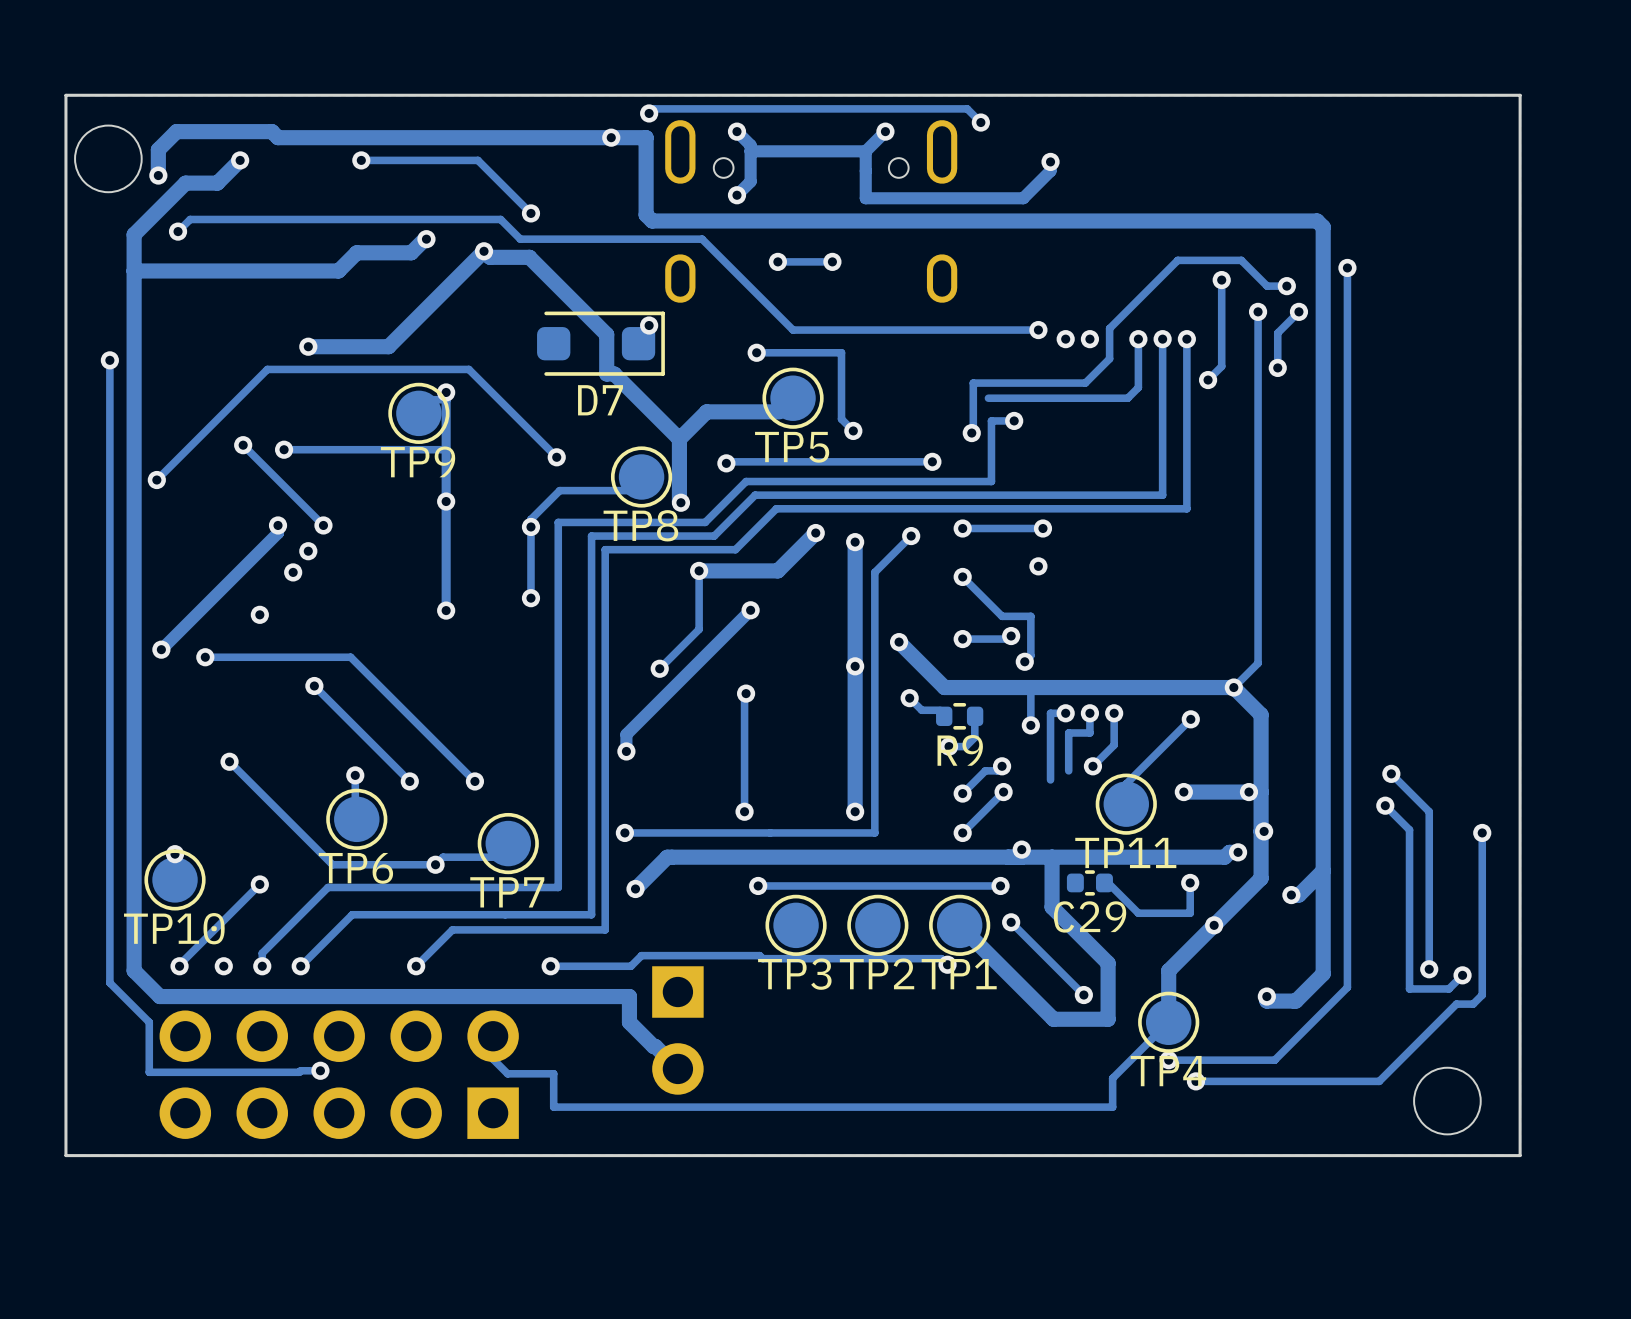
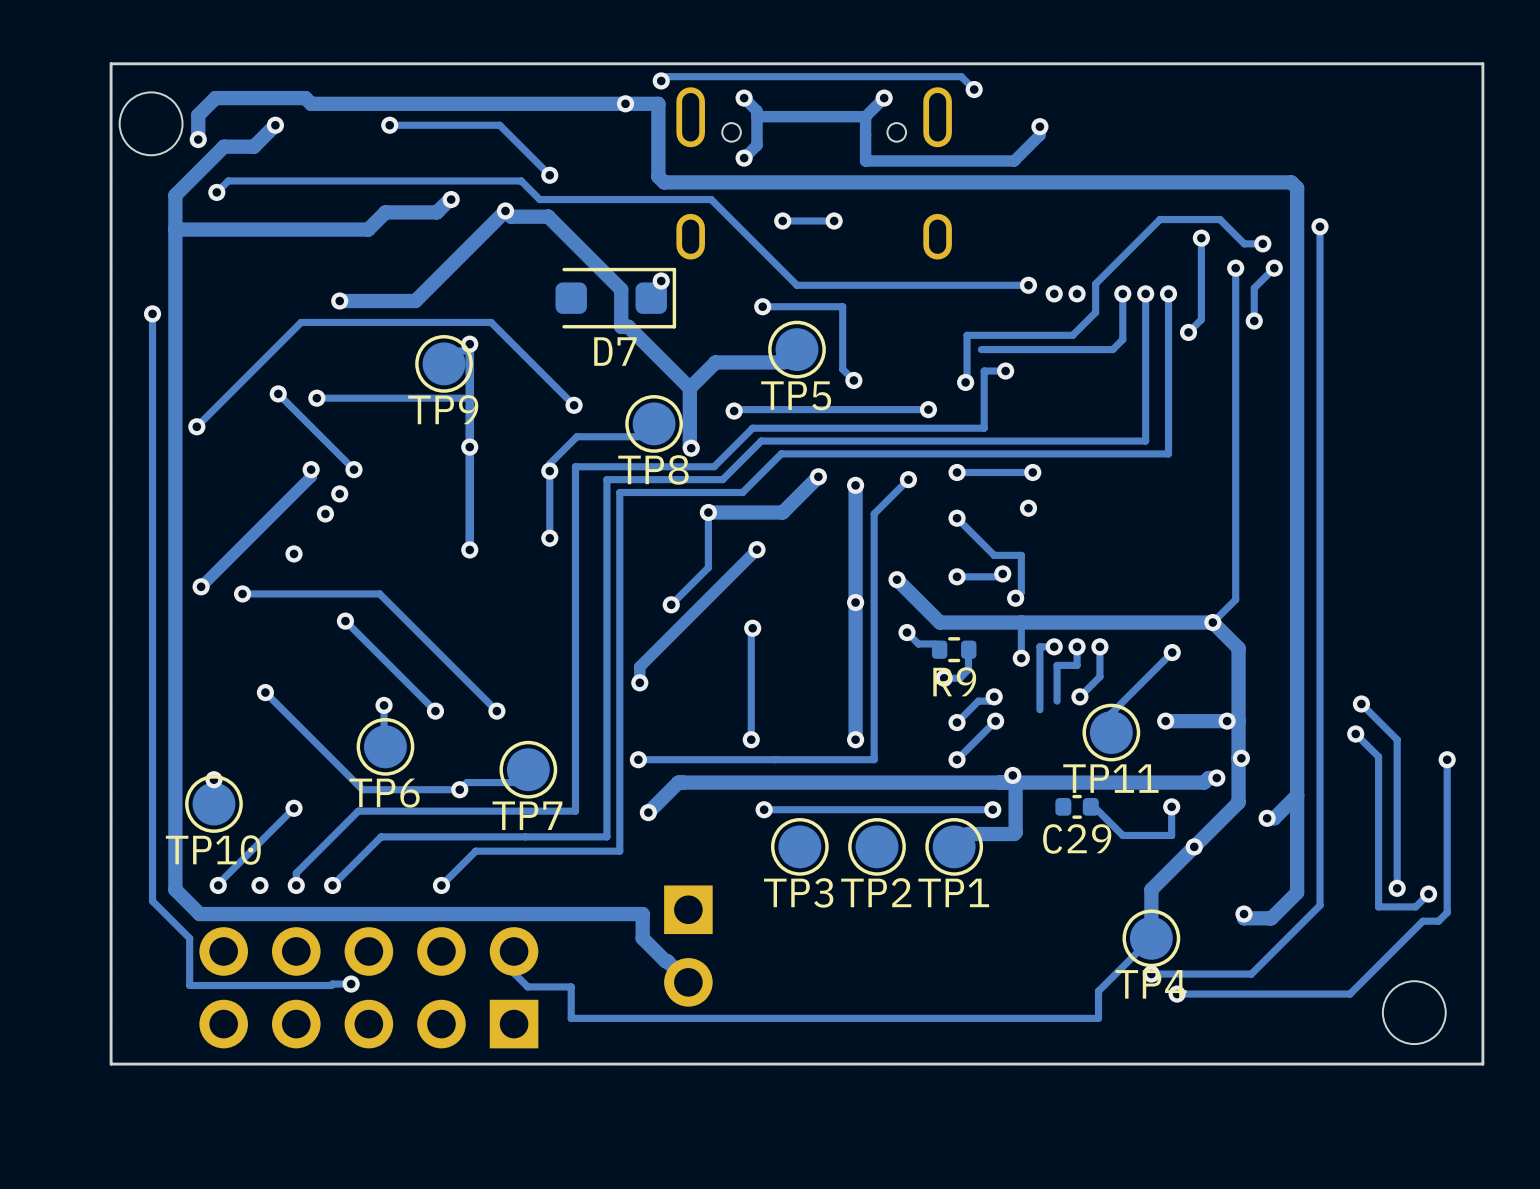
track: none -> (1015, 782) (1015, 832) (967, 834)
track: (1052, 857) (1052, 907) (1108, 963) (1108, 1019) (1053, 1019) (973, 938) -> none
track: (1011, 922) (1083, 995) -> none
via: (1011, 922) -> none
track: (947, 964) (941, 958) (762, 958) (759, 955) (641, 955) (630, 966) (550, 966) -> none
via: (947, 964) -> none
via: (550, 966) -> none
via: (1083, 995) -> none

